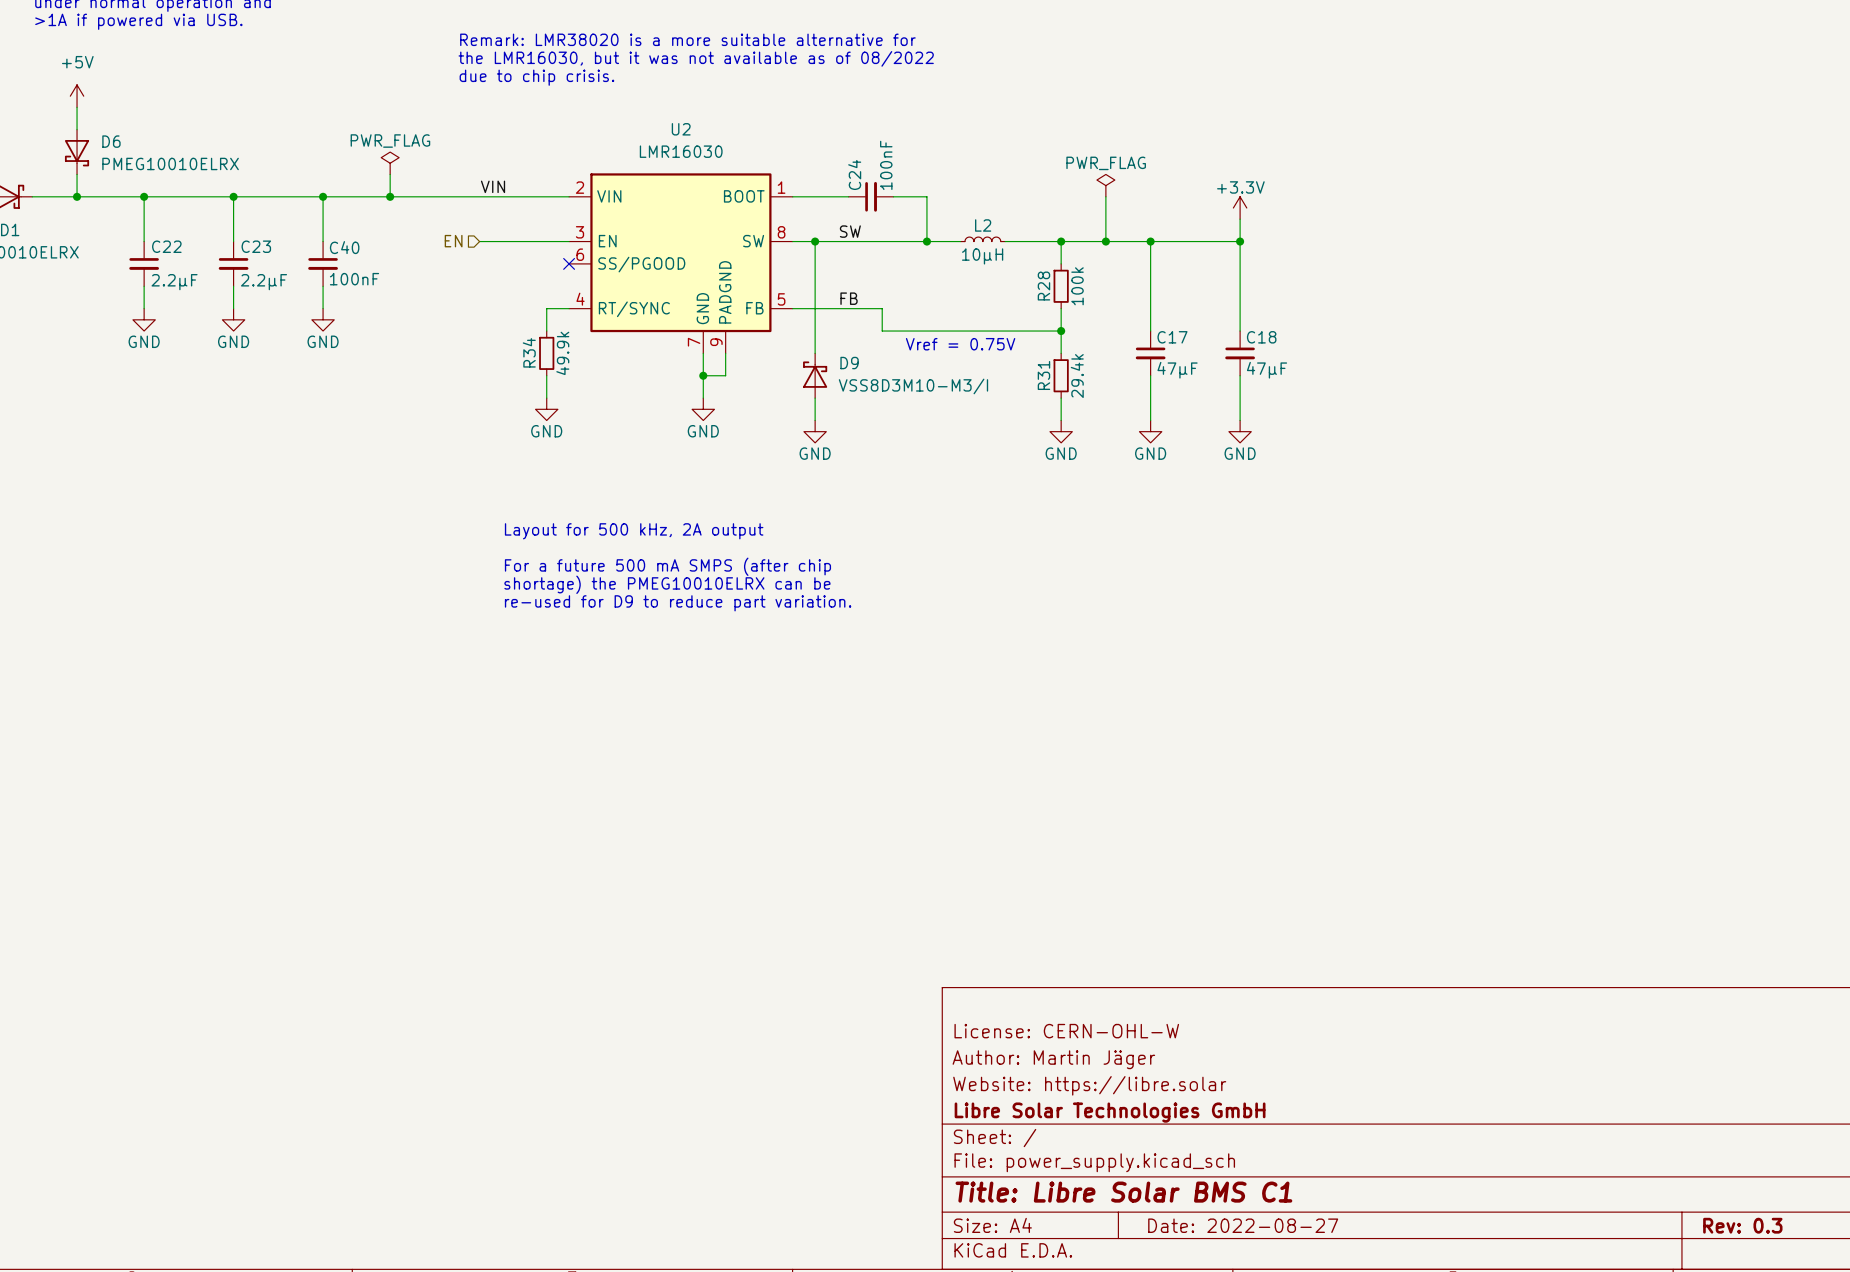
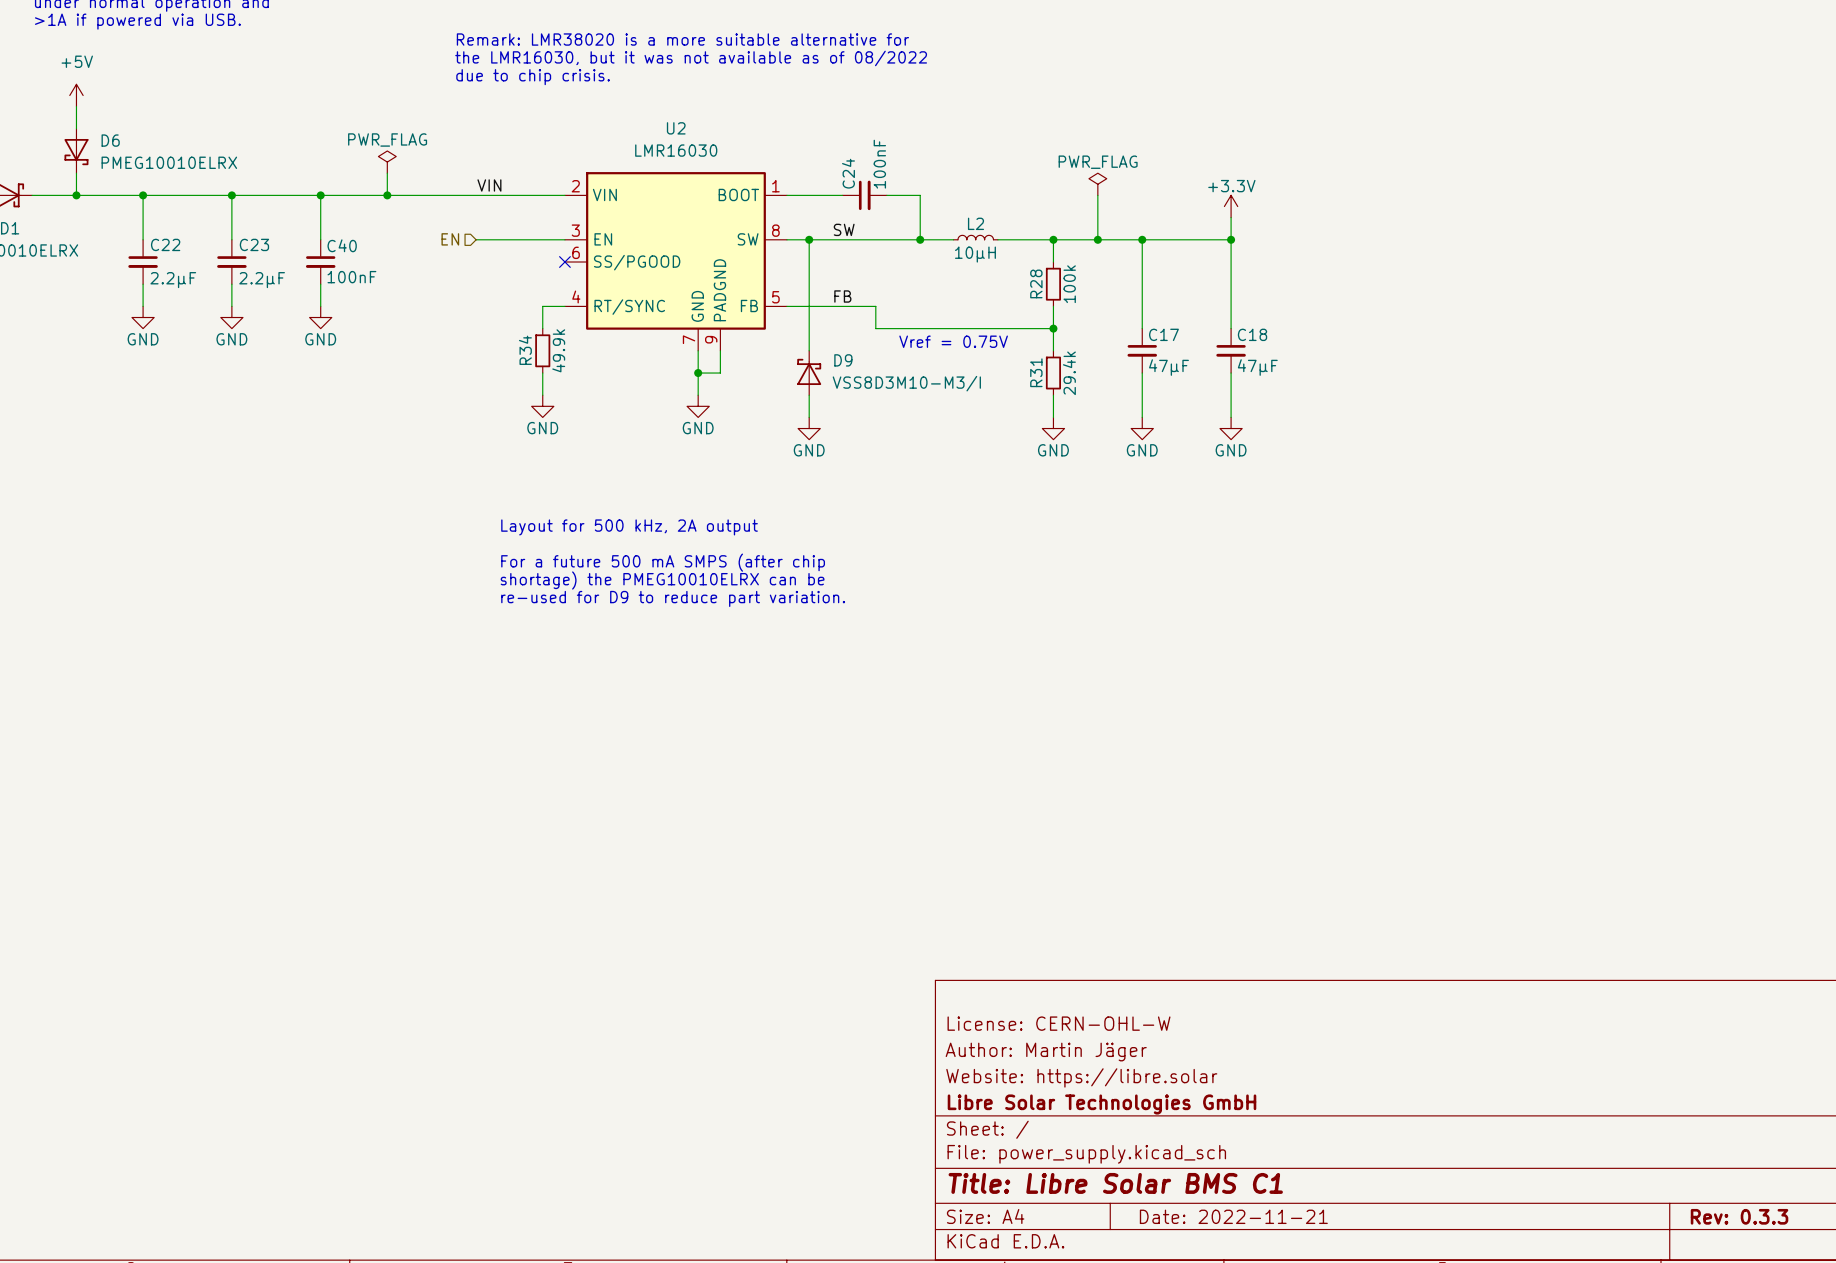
title block: Date: 2022-08-27 (1243, 1225) -> Date: 2022-11-21 (1233, 1216)
title block: Rev: 0.3 (1742, 1225) -> Rev: 0.3.3 (1739, 1216)

